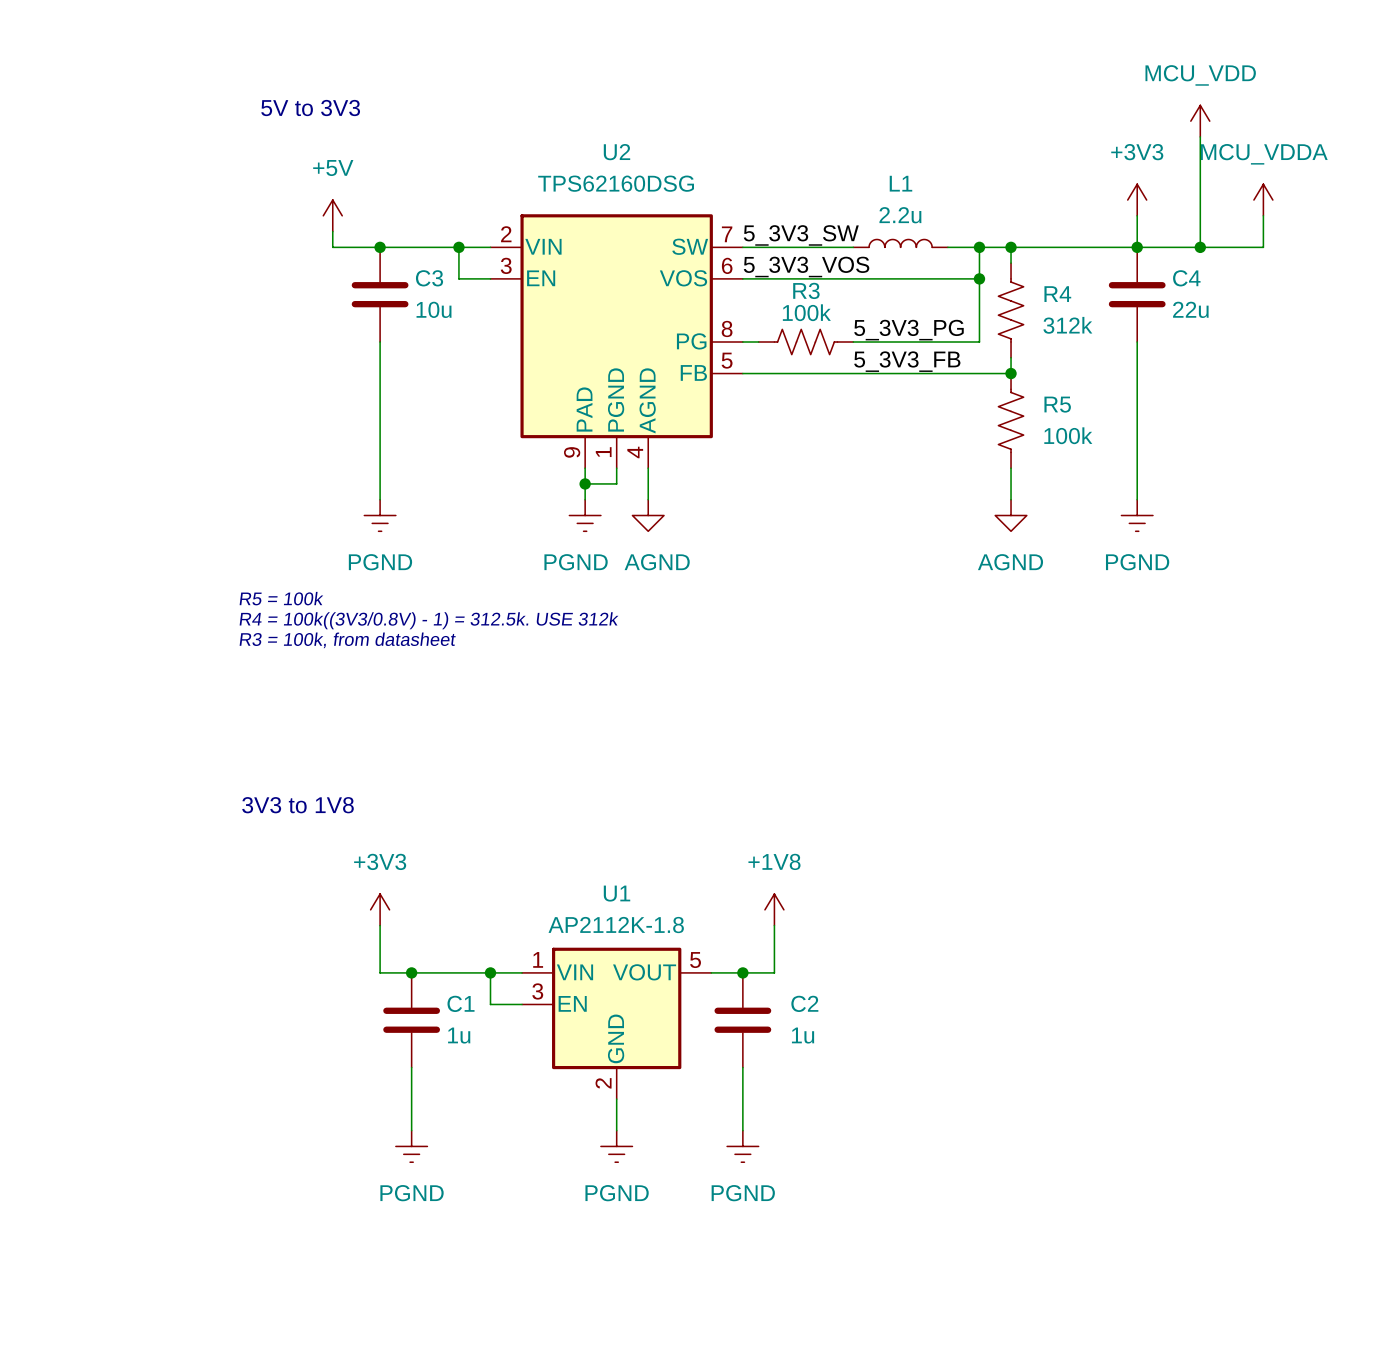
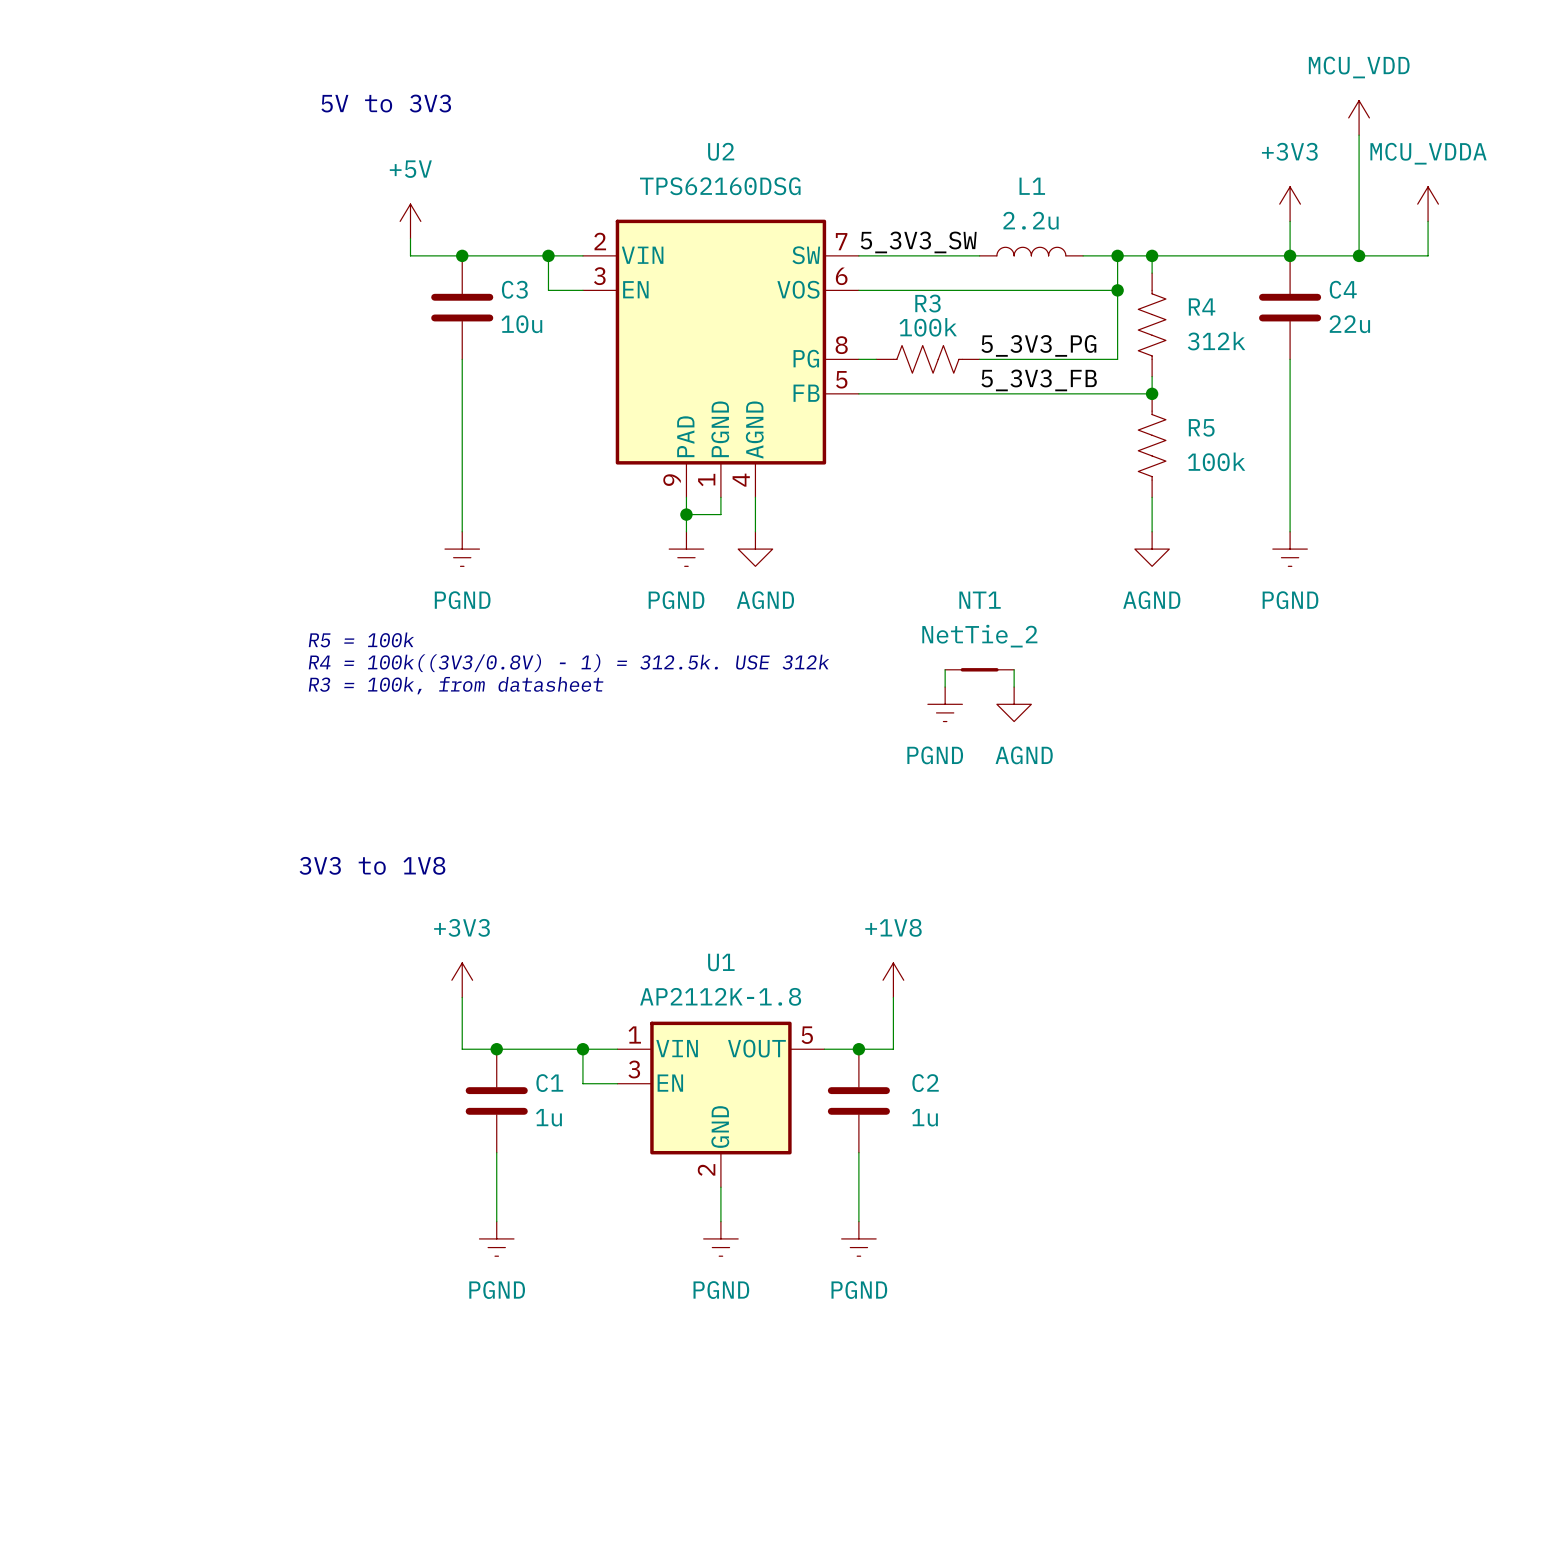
label: 5_3V3_VOS (806, 266) -> none
wire: none -> (945, 669) (945, 687)
NT1: none -> NetTie_2 (979, 669)
wire: none -> (1014, 669) (1014, 687)
power symbol: none -> PGND (945, 704)
power symbol: none -> AGND (1014, 704)

